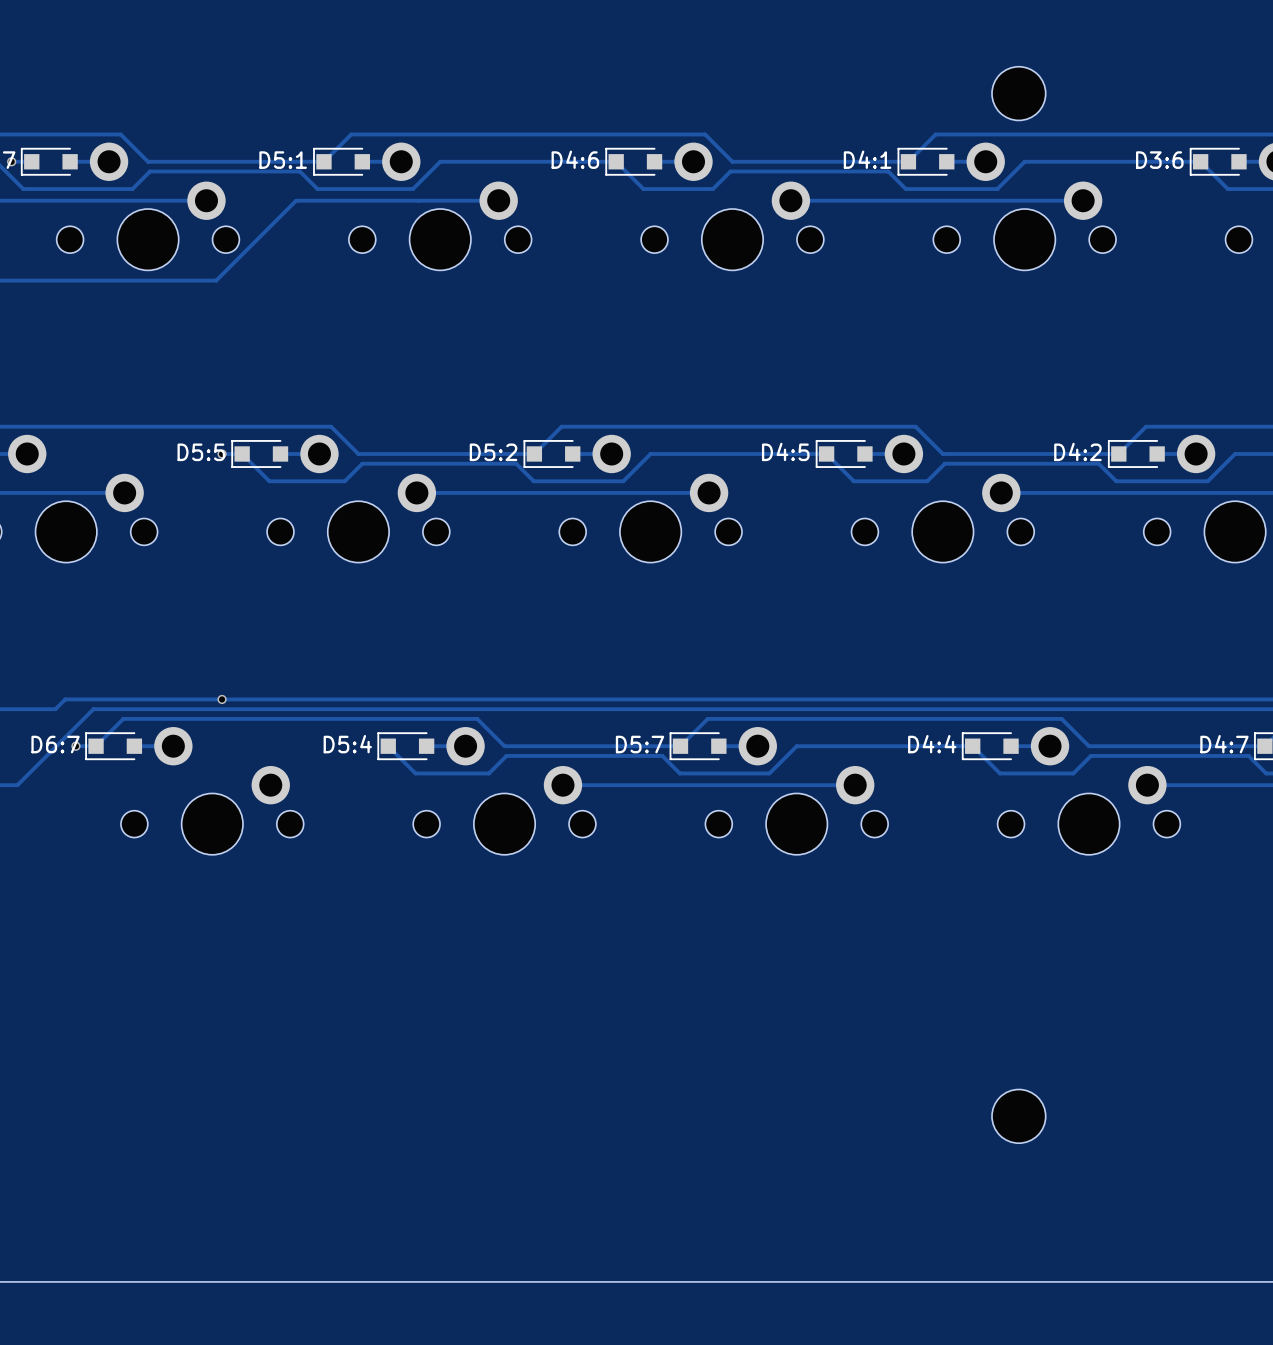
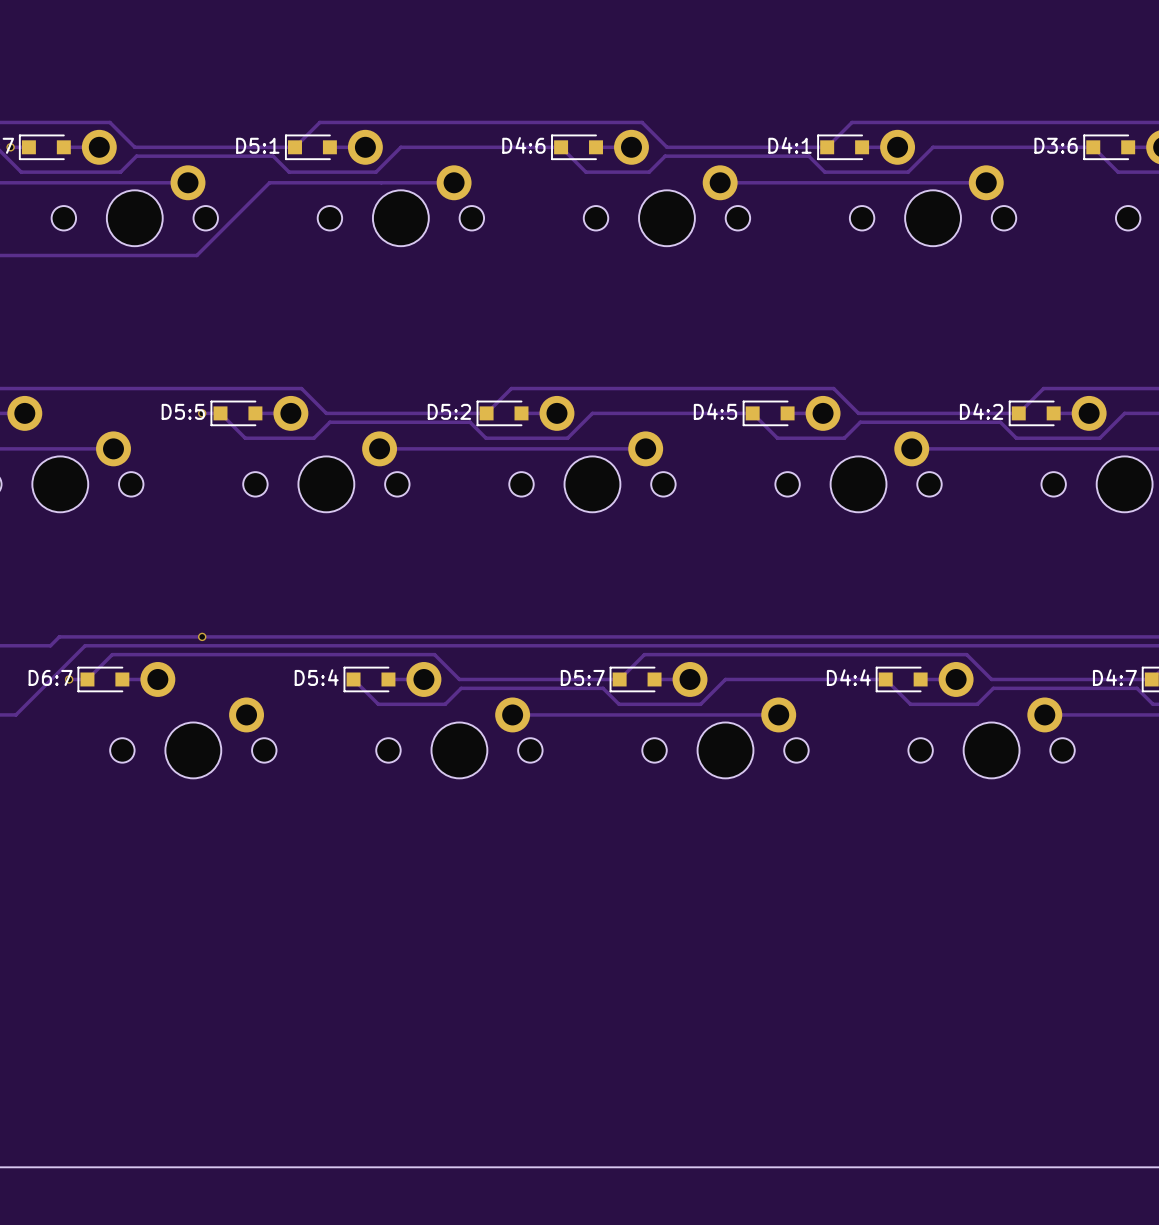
part: (1018, 93) -> none
part: (1018, 1116) -> none

